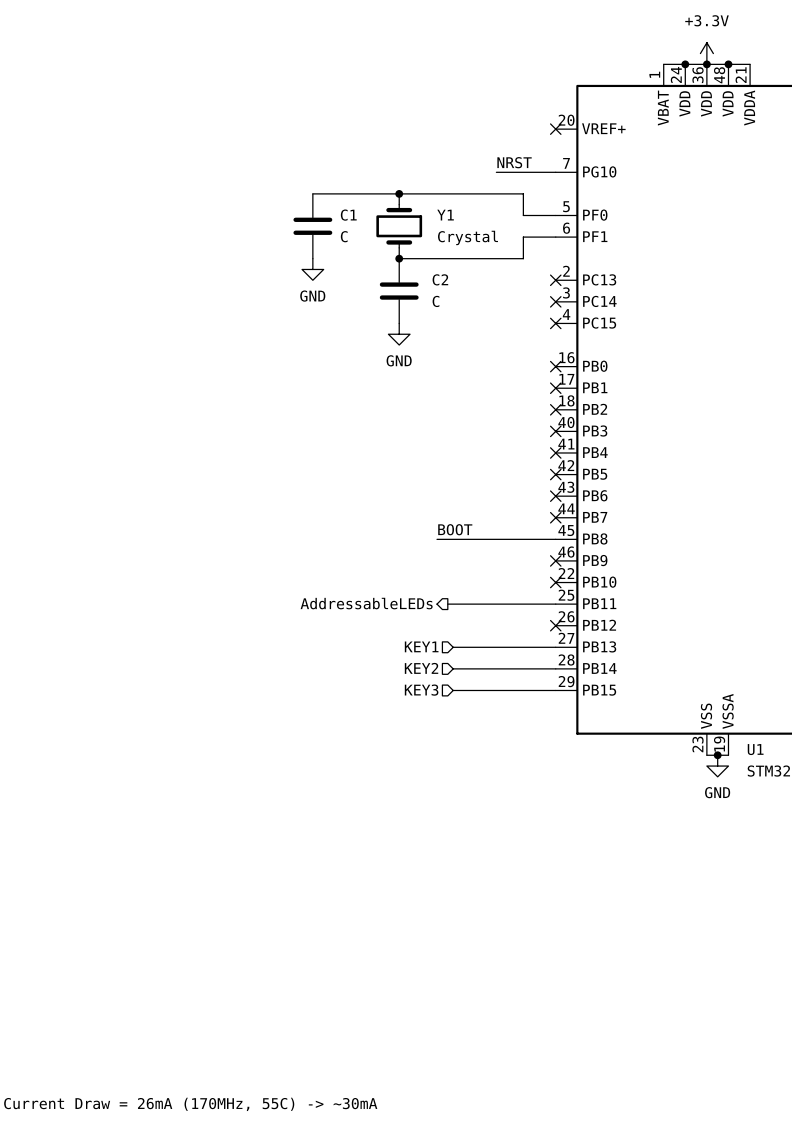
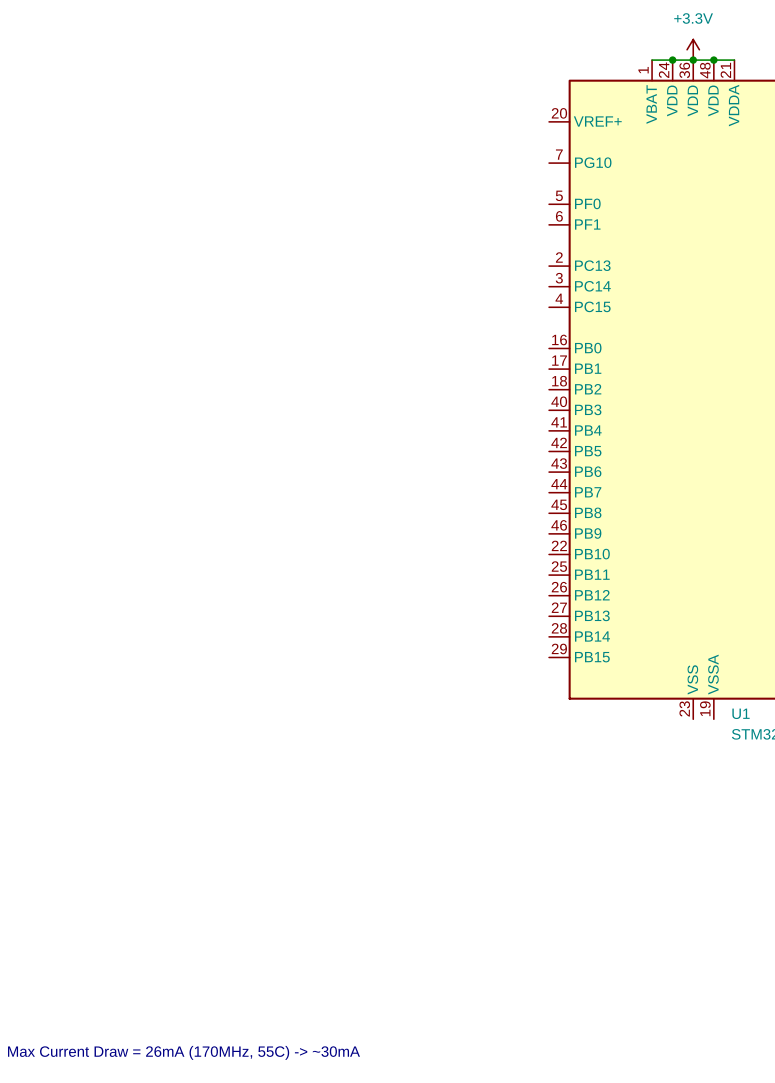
no-connect mark: (555, 129) -> none
label: NRST (514, 162) -> none
wire: (496, 172) (555, 172) -> none
wire: (312, 193) (523, 193) (523, 215) (555, 215) -> none
junction: (399, 193) -> none
C1: C (312, 226) -> none
Y1: Crystal (399, 226) -> none
wire: (555, 237) (523, 237) (523, 258) (399, 258) -> none
junction: (399, 258) -> none
power symbol: GND (312, 269) -> none
no-connect mark: (555, 280) -> none
C2: C (399, 291) -> none
no-connect mark: (555, 301) -> none
no-connect mark: (555, 323) -> none
power symbol: GND (399, 334) -> none
no-connect mark: (555, 366) -> none
no-connect mark: (555, 388) -> none
no-connect mark: (555, 409) -> none
no-connect mark: (555, 431) -> none
no-connect mark: (555, 452) -> none
no-connect mark: (555, 474) -> none
no-connect mark: (555, 496) -> none
no-connect mark: (555, 517) -> none
label: BOOT (455, 529) -> none
wire: (437, 539) (555, 539) -> none
no-connect mark: (555, 560) -> none
no-connect mark: (555, 582) -> none
hierarchical label: AddressableLEDs (366, 603) -> none
wire: (447, 604) (555, 604) -> none
no-connect mark: (555, 625) -> none
hierarchical label: KEY1 (421, 646) -> none
wire: (453, 647) (555, 647) -> none
hierarchical label: KEY2 (421, 668) -> none
wire: (453, 668) (555, 668) -> none
hierarchical label: KEY3 (421, 690) -> none
wire: (453, 690) (555, 690) -> none
wire: (706, 755) (728, 755) -> none
junction: (717, 755) -> none
power symbol: GND (717, 766) -> none

